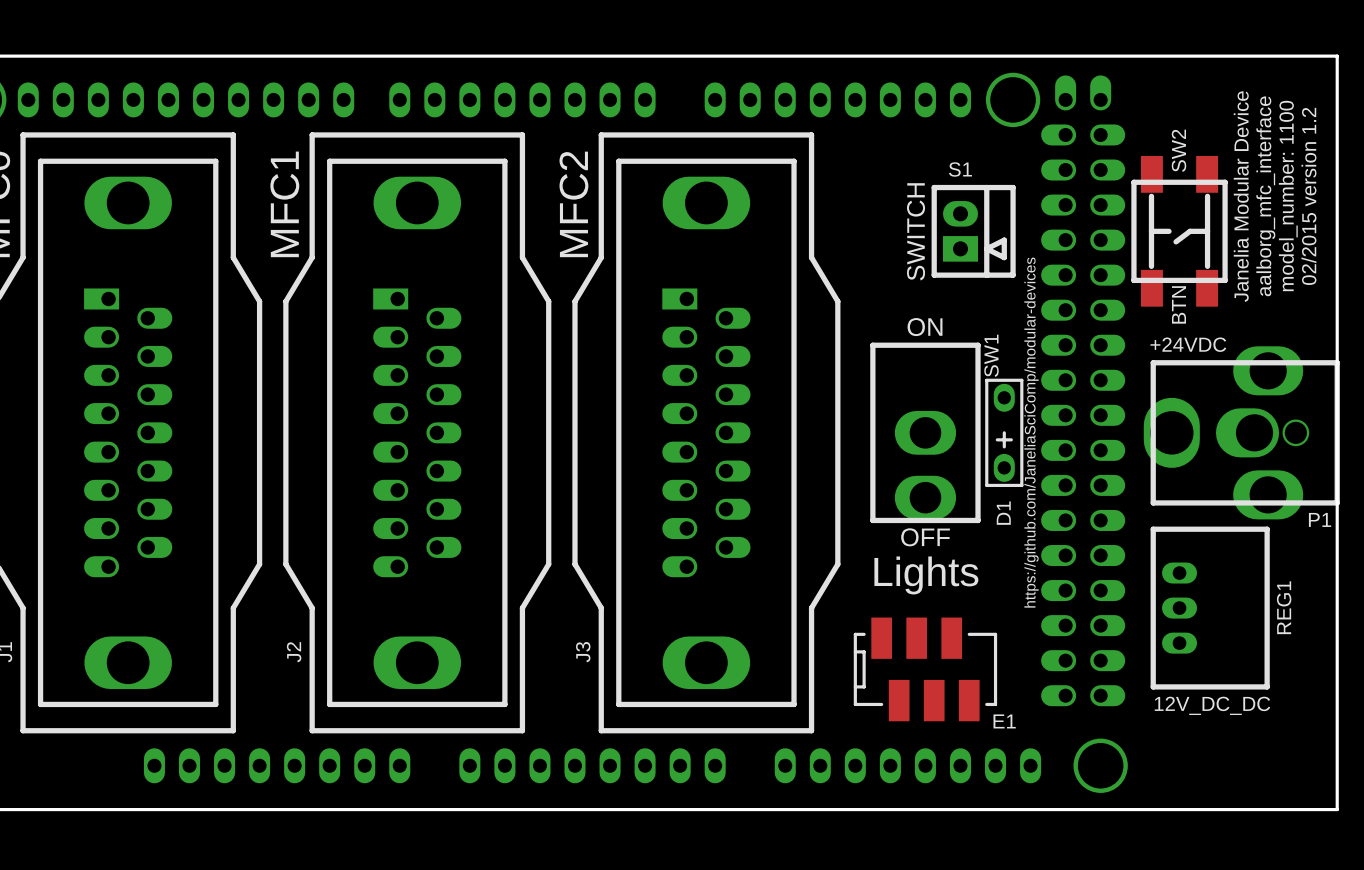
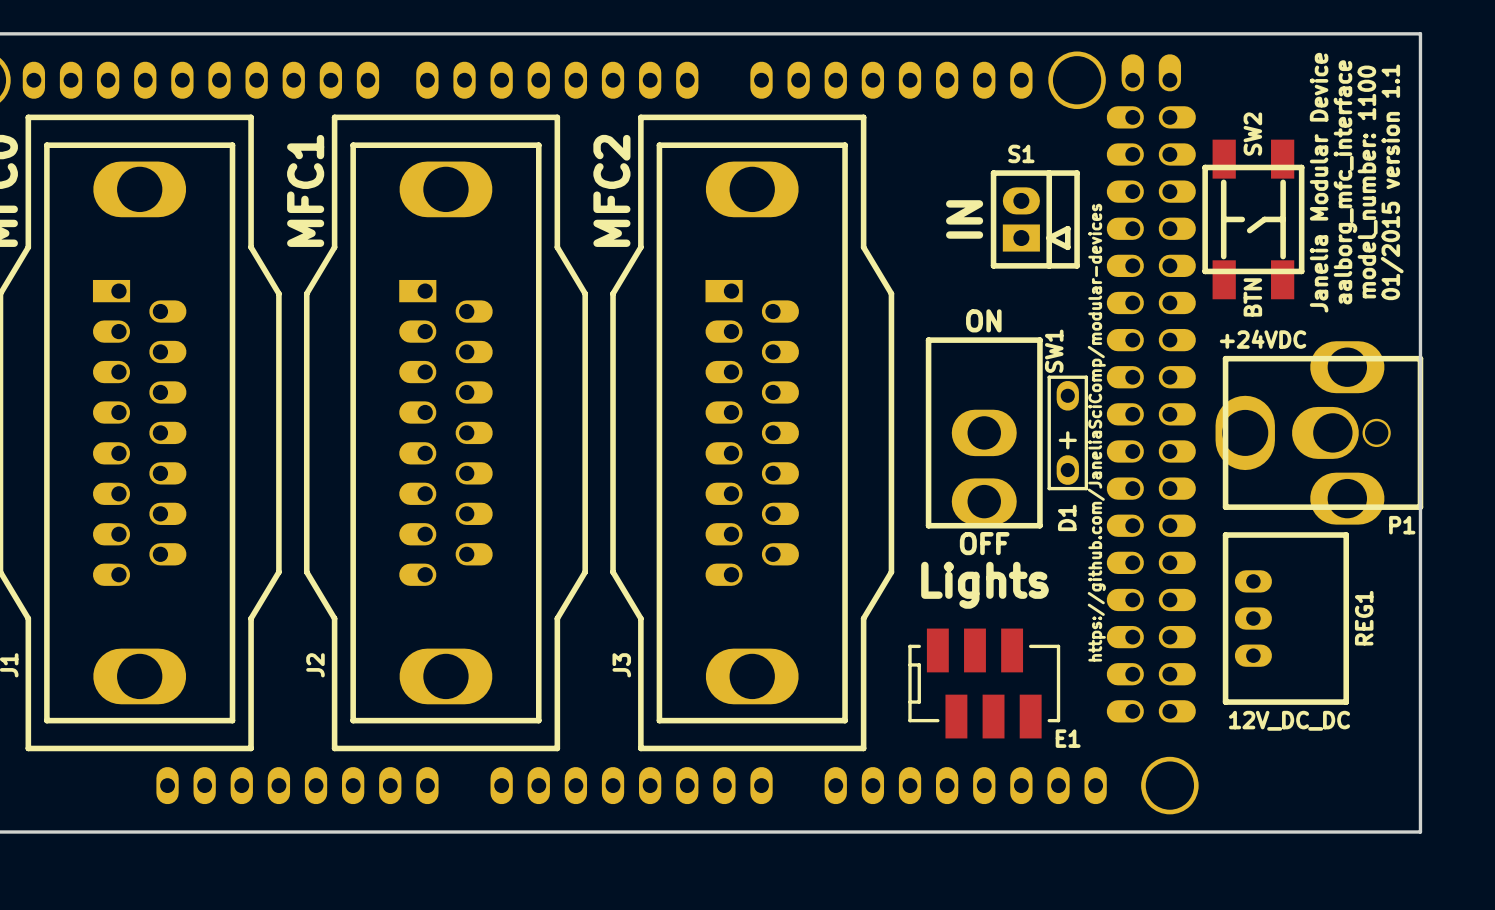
text: 02/2015 version 1.2 (1308, 196) -> 01/2015 version 1.1 (1392, 182)
text: SWITCH (916, 231) -> IN (964, 219)

